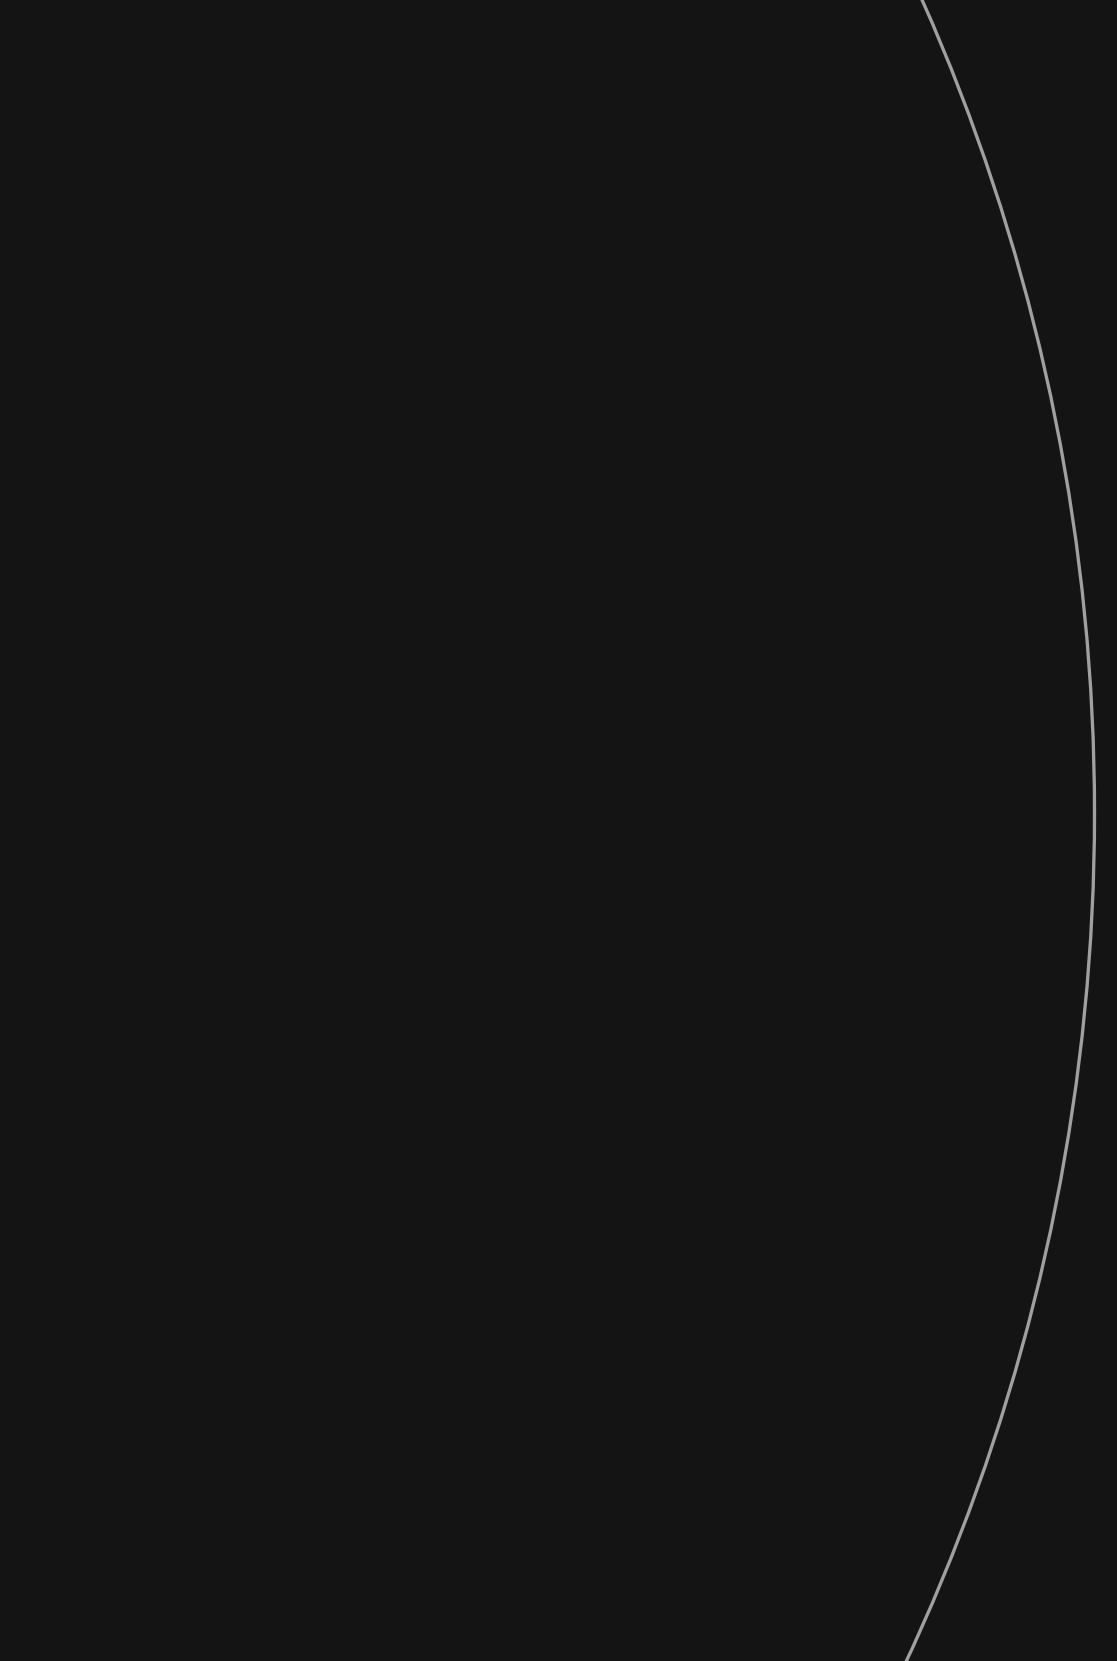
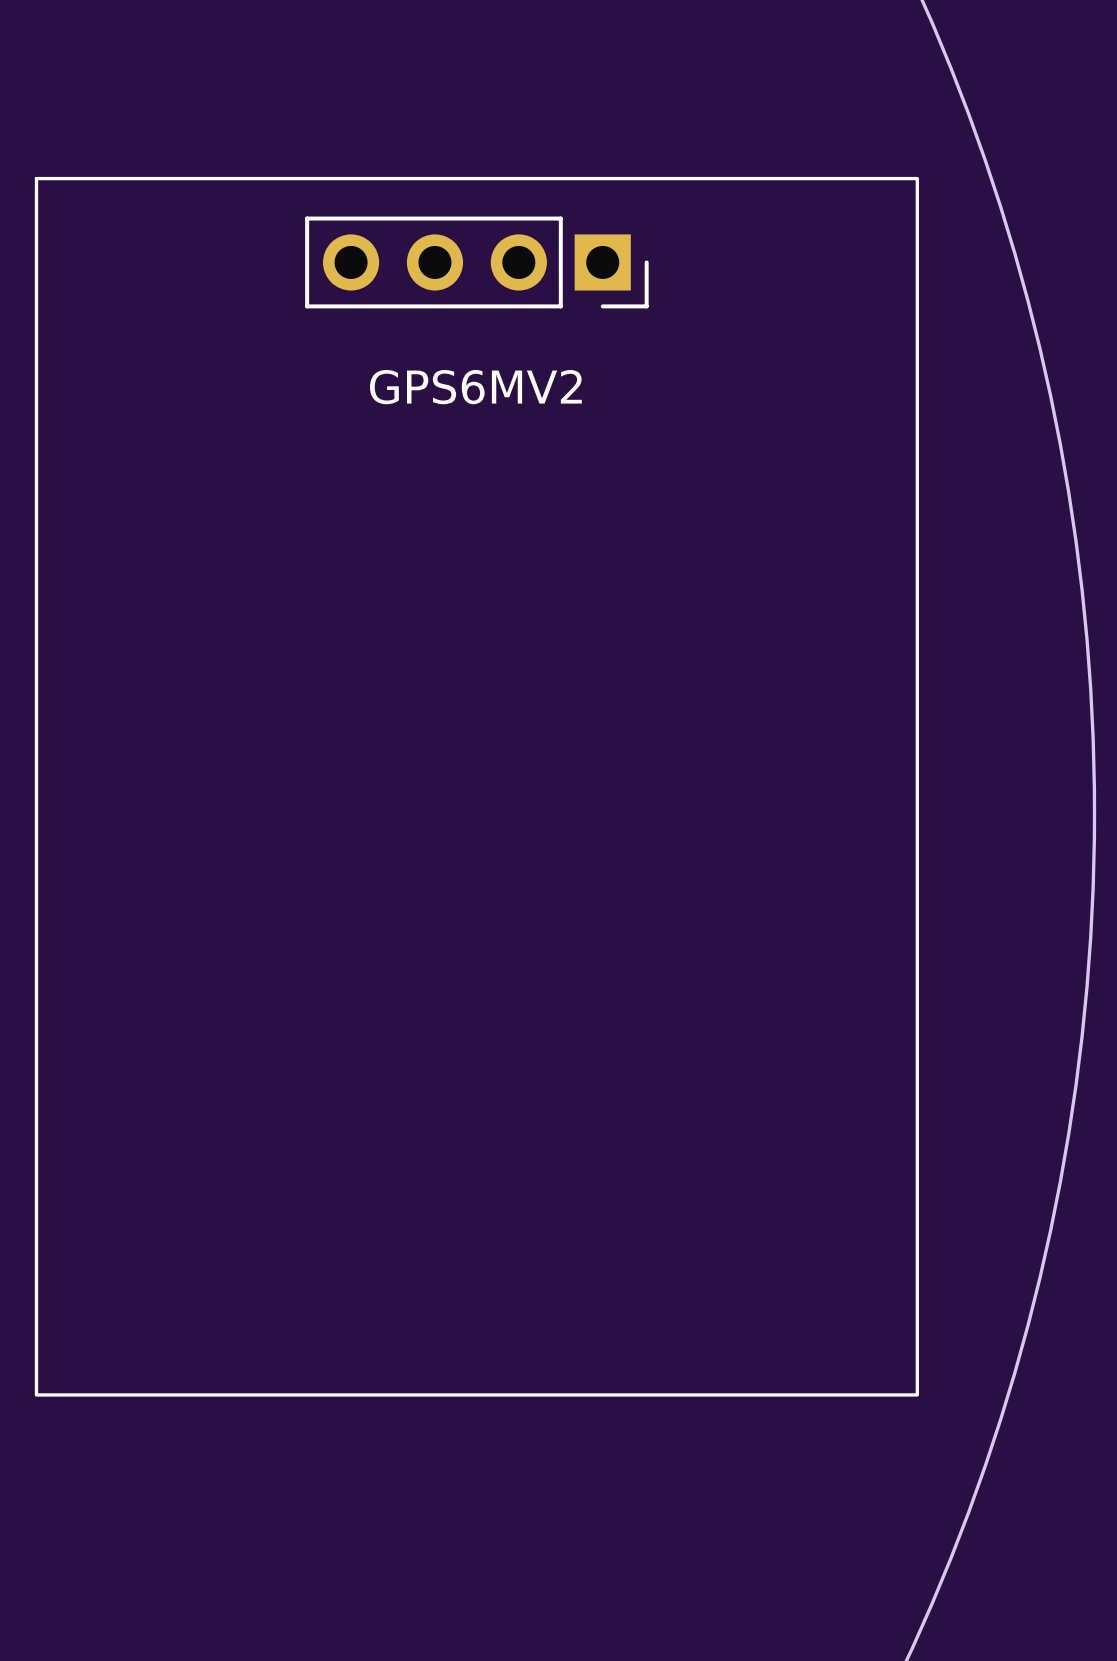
GPS6MV2: none -> (476, 786)

